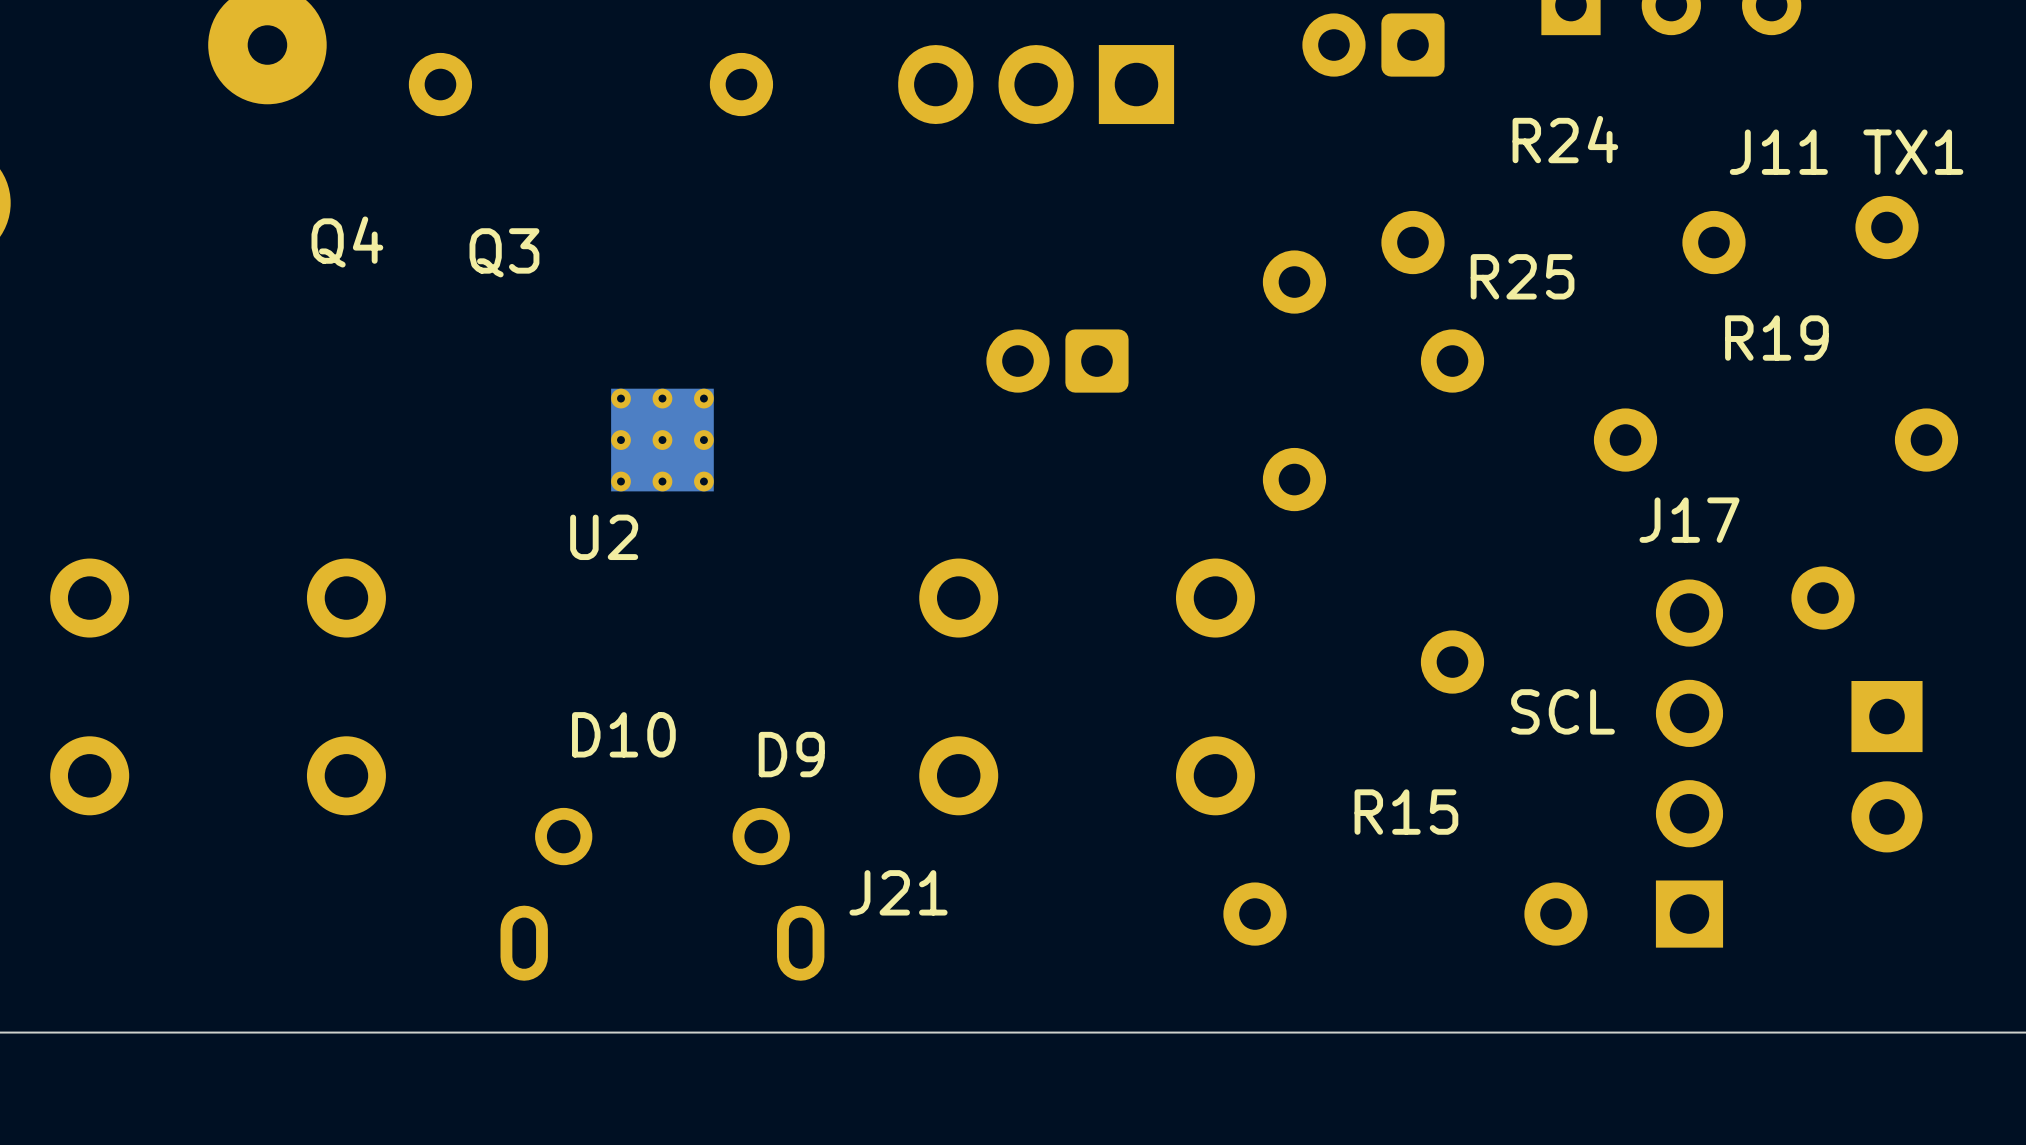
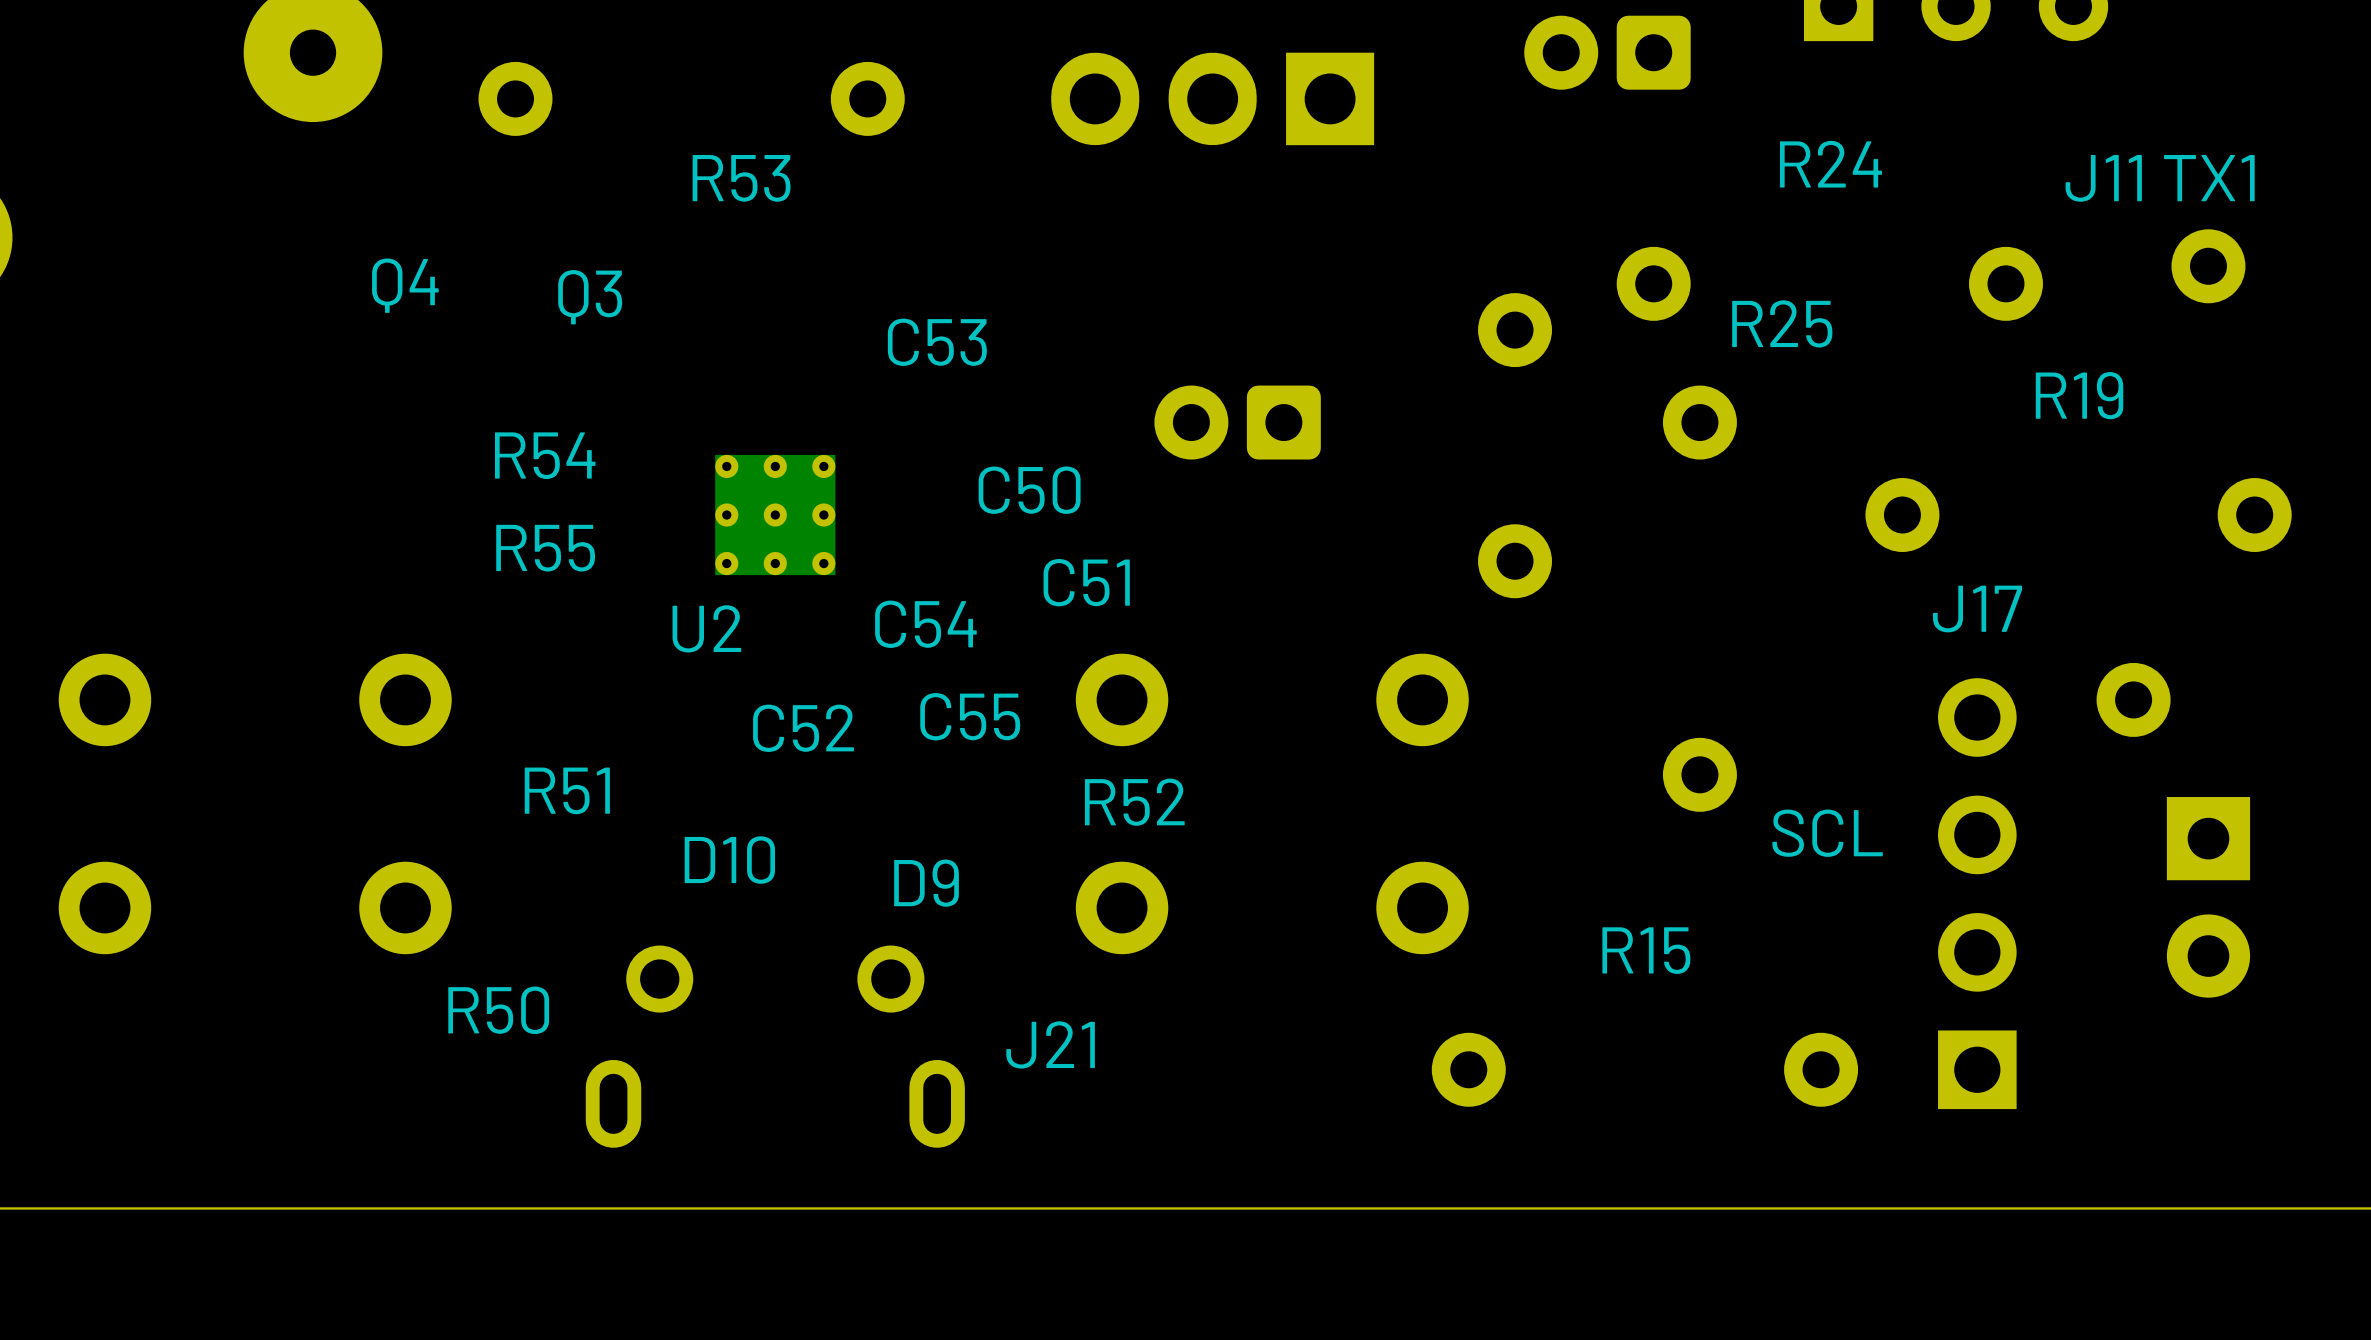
R53: none -> (741, 178)
C53: none -> (937, 342)
R54: none -> (545, 455)
C50: none -> (1029, 490)
R55: none -> (545, 548)
C51: none -> (1086, 582)
C54: none -> (925, 624)
C55: none -> (970, 716)
C52: none -> (803, 728)
R51: none -> (567, 790)
R52: none -> (1134, 802)
R50: none -> (498, 1010)

